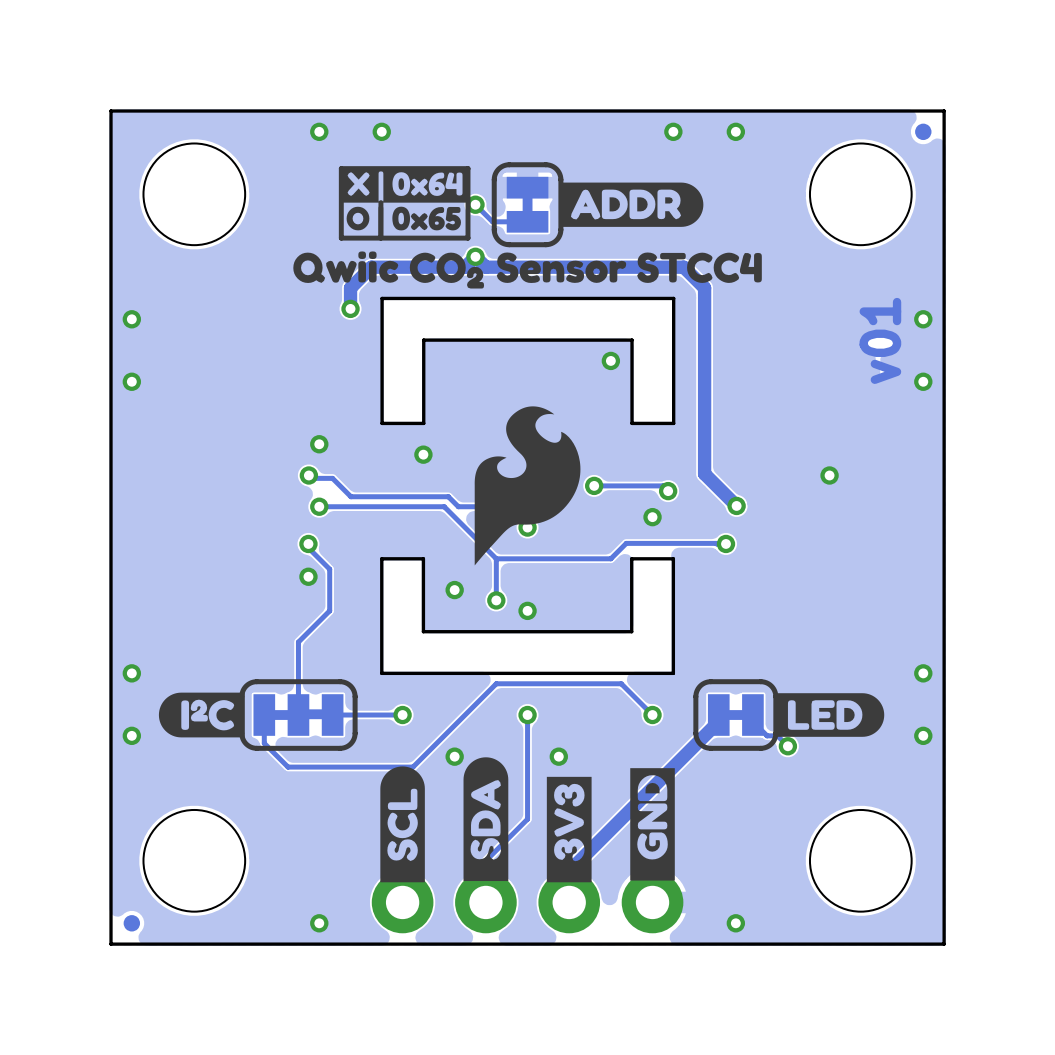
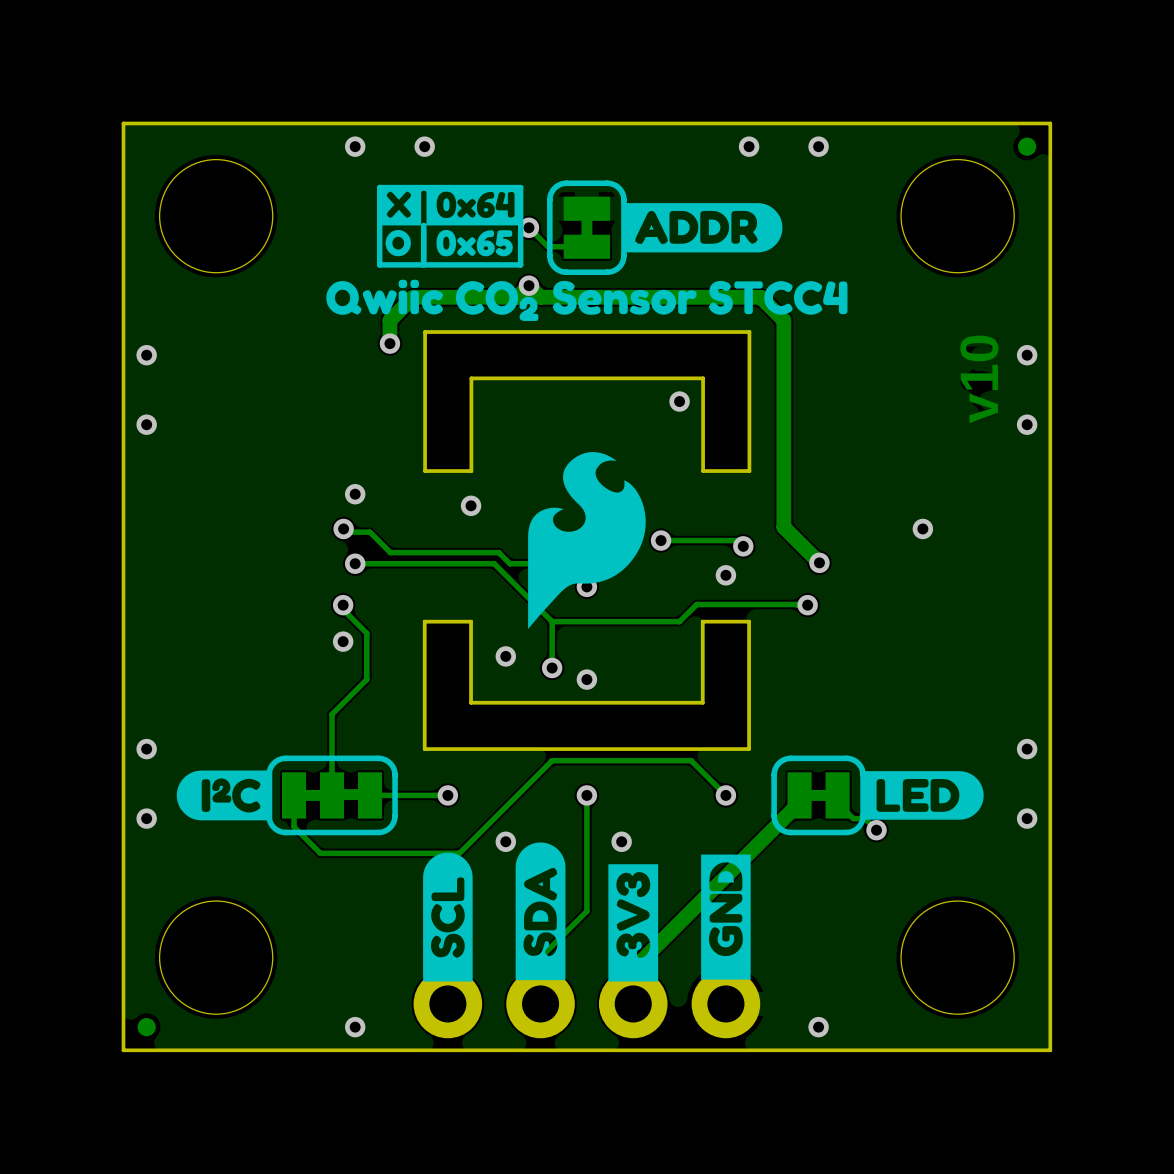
text: v01 (880, 340) -> v10 (979, 379)

